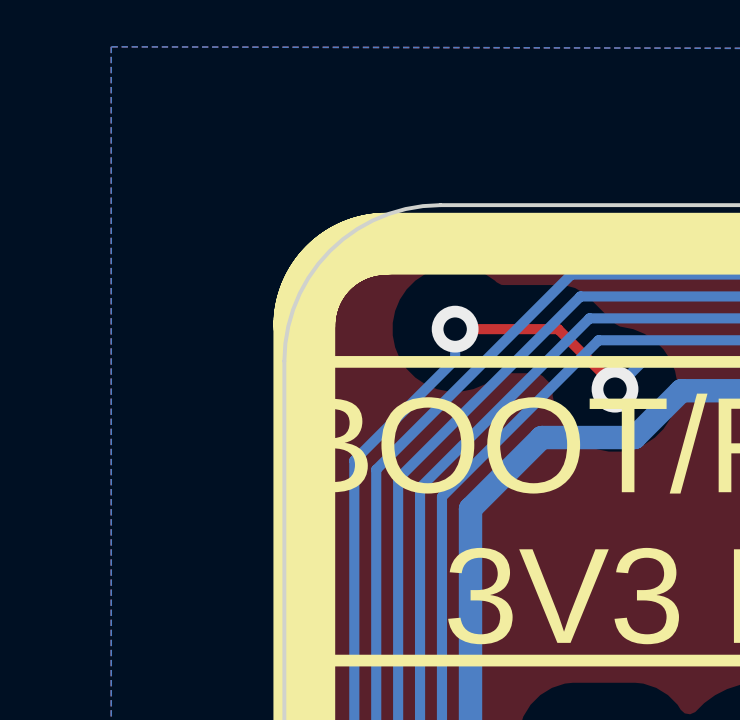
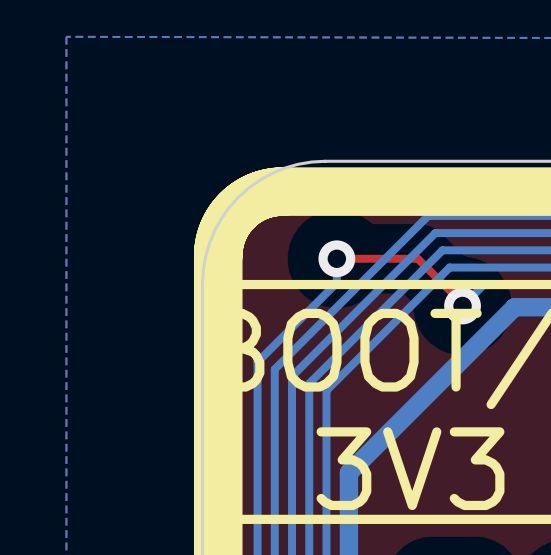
bottom track: (634, 437) (541, 437) (470, 508) (470, 601) -> (477, 344) (348, 472)

